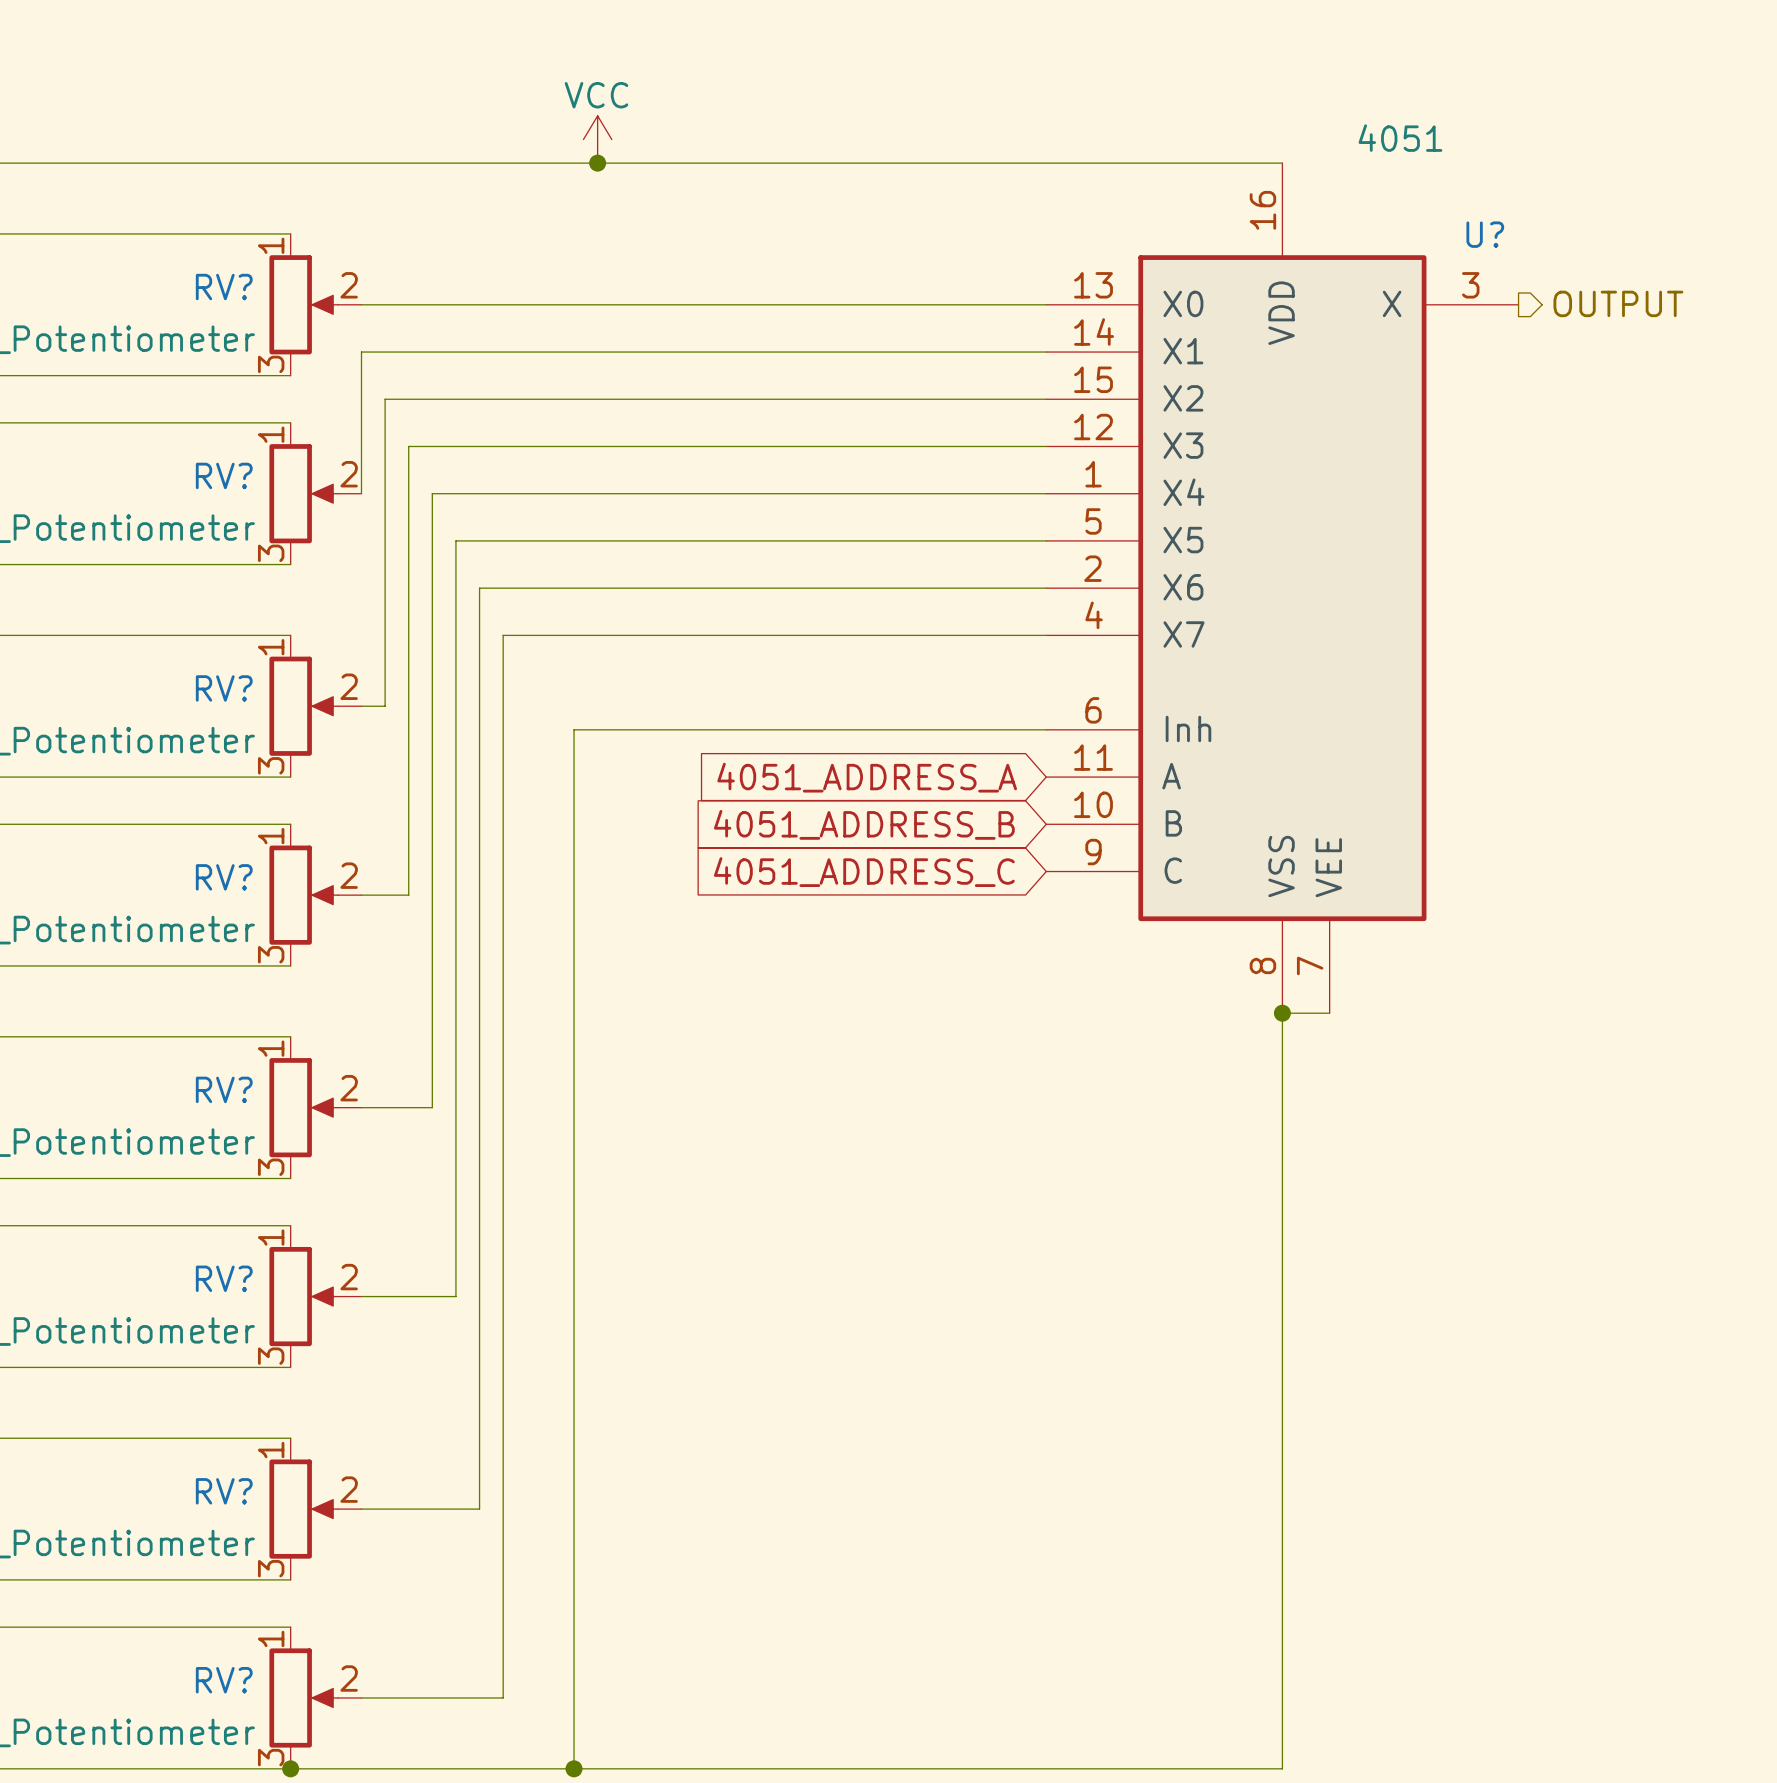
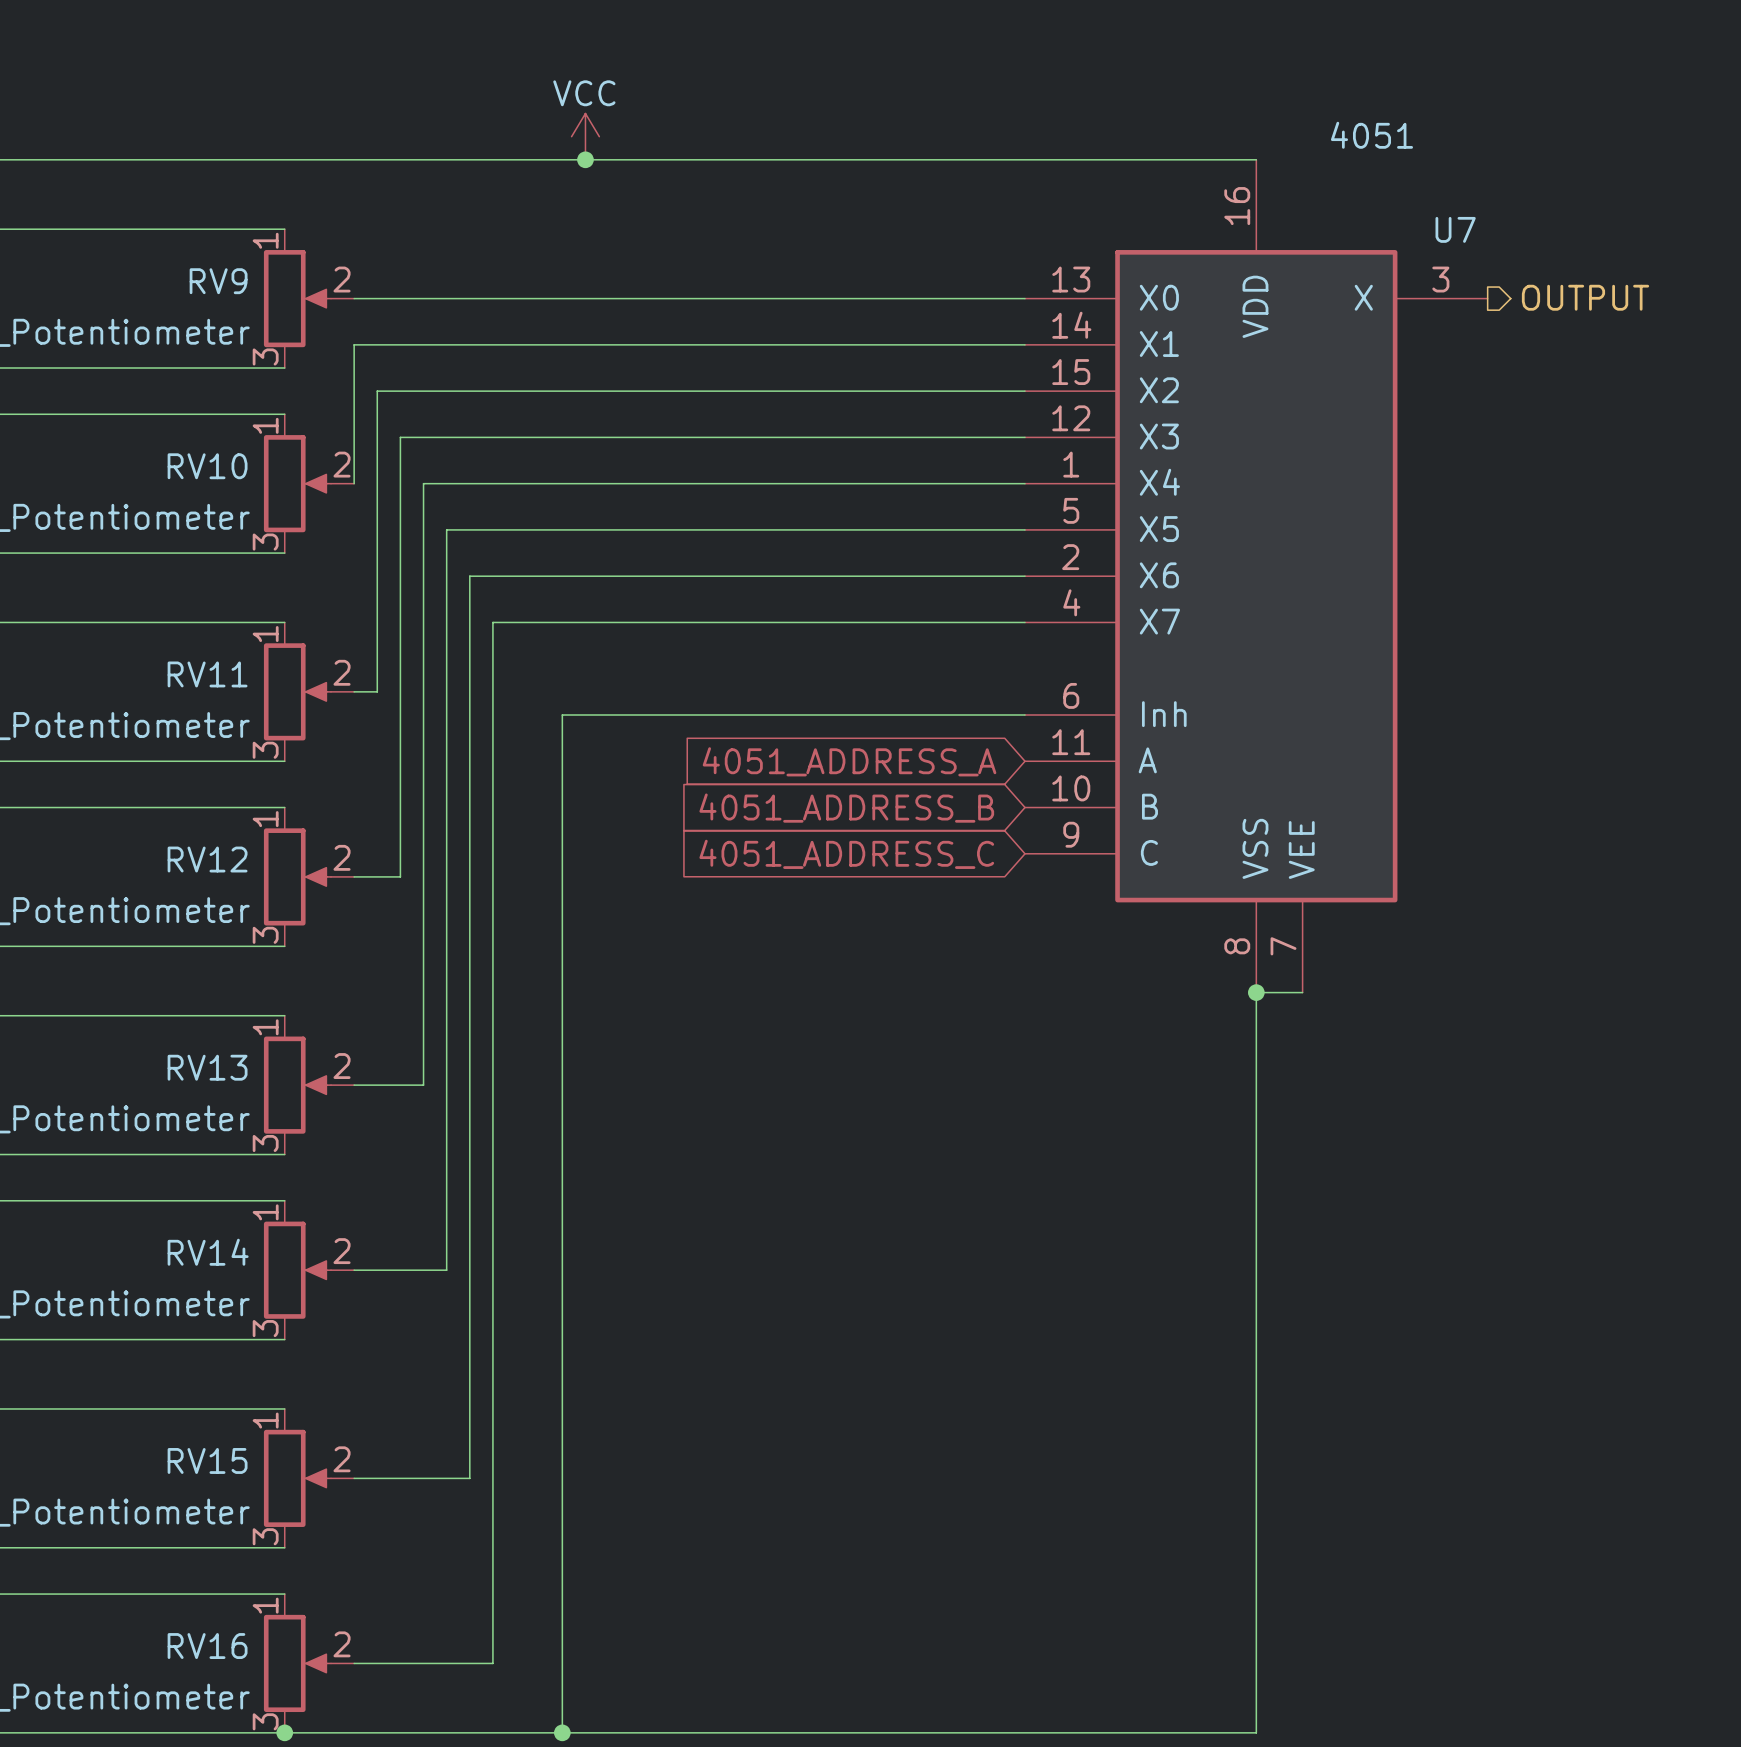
U? name: U? (1485, 234) -> U7 (1455, 229)
RV? name: RV? (224, 287) -> RV9 (218, 281)
RV? name: RV? (224, 475) -> RV10 (207, 466)
RV? name: RV? (224, 688) -> RV11 (207, 674)
RV? name: RV? (224, 877) -> RV12 (207, 859)
RV? name: RV? (224, 1089) -> RV13 (207, 1067)
RV? name: RV? (224, 1278) -> RV14 (208, 1252)
RV? name: RV? (224, 1491) -> RV15 (207, 1460)
RV? name: RV? (224, 1680) -> RV16 (207, 1646)

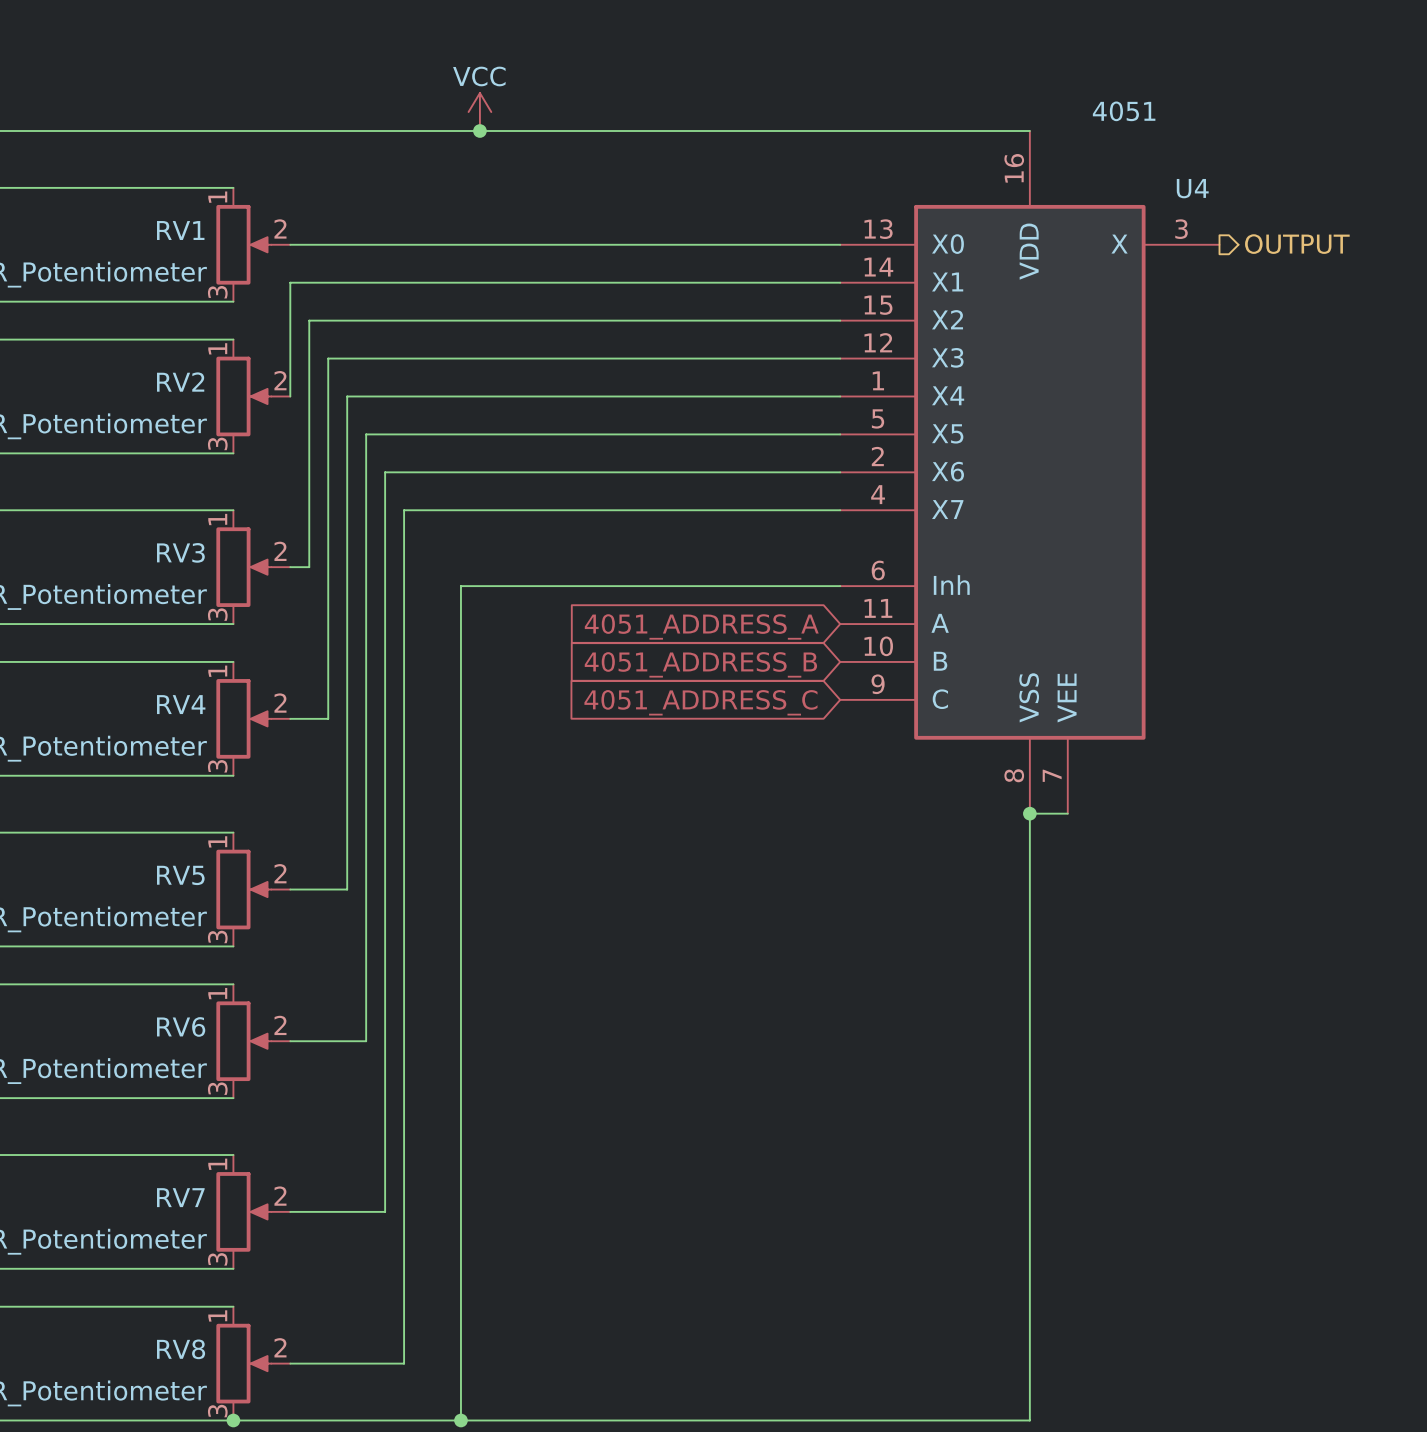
U7 name: U7 (1455, 229) -> U4 (1192, 188)
RV9 name: RV9 (218, 281) -> RV1 (180, 230)
RV10 name: RV10 (207, 466) -> RV2 (180, 382)
RV11 name: RV11 (207, 674) -> RV3 (180, 552)
RV12 name: RV12 (207, 859) -> RV4 (181, 704)
RV13 name: RV13 (207, 1067) -> RV5 (180, 875)
RV14 name: RV14 (208, 1252) -> RV6 (181, 1026)
RV15 name: RV15 (207, 1460) -> RV7 (180, 1197)
RV16 name: RV16 (207, 1646) -> RV8 (181, 1349)

